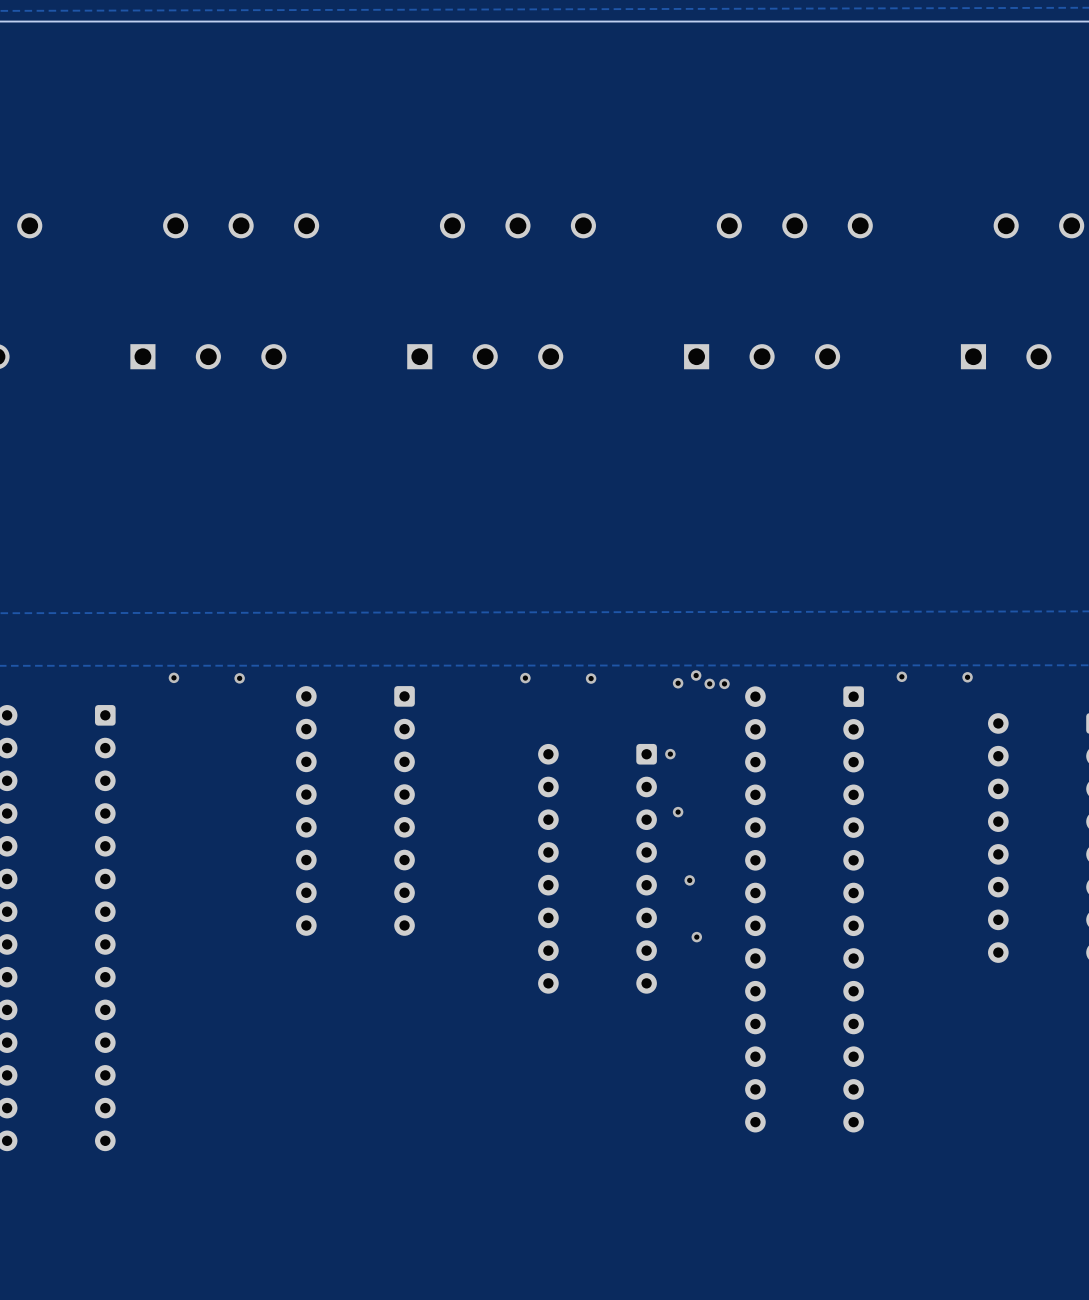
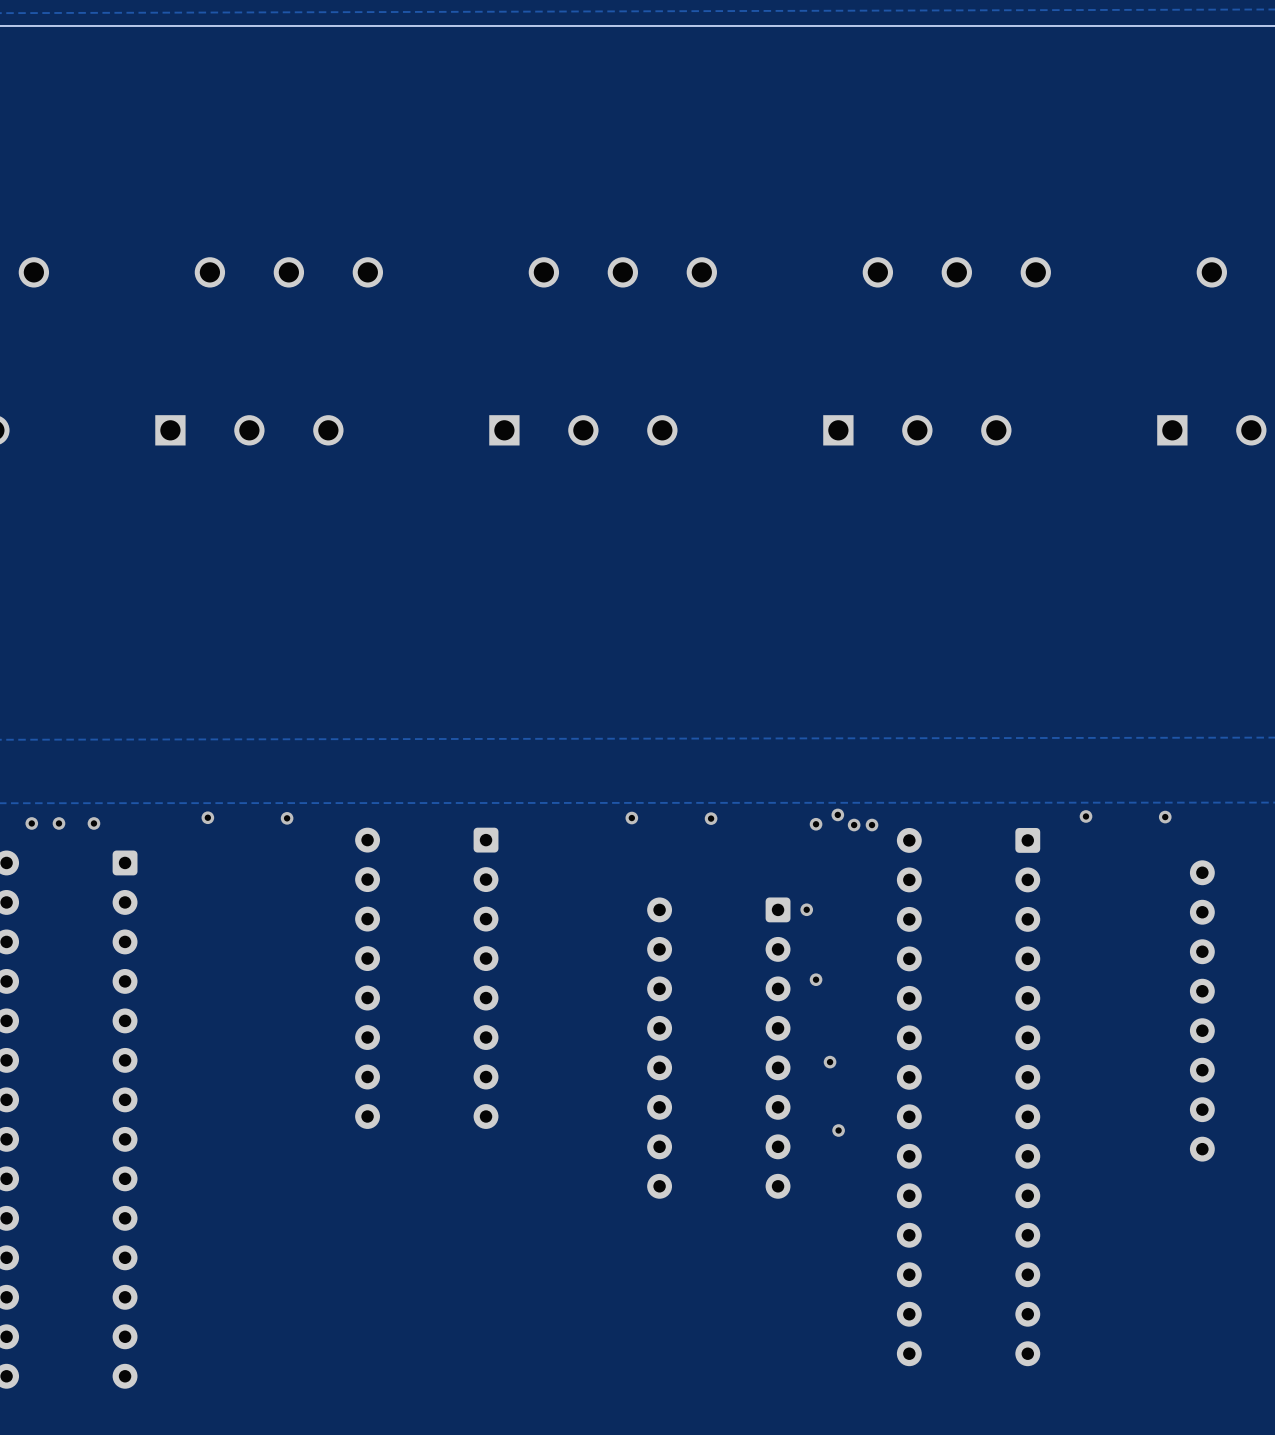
via: none -> (31, 823)
via: none -> (58, 823)
via: none -> (93, 823)

